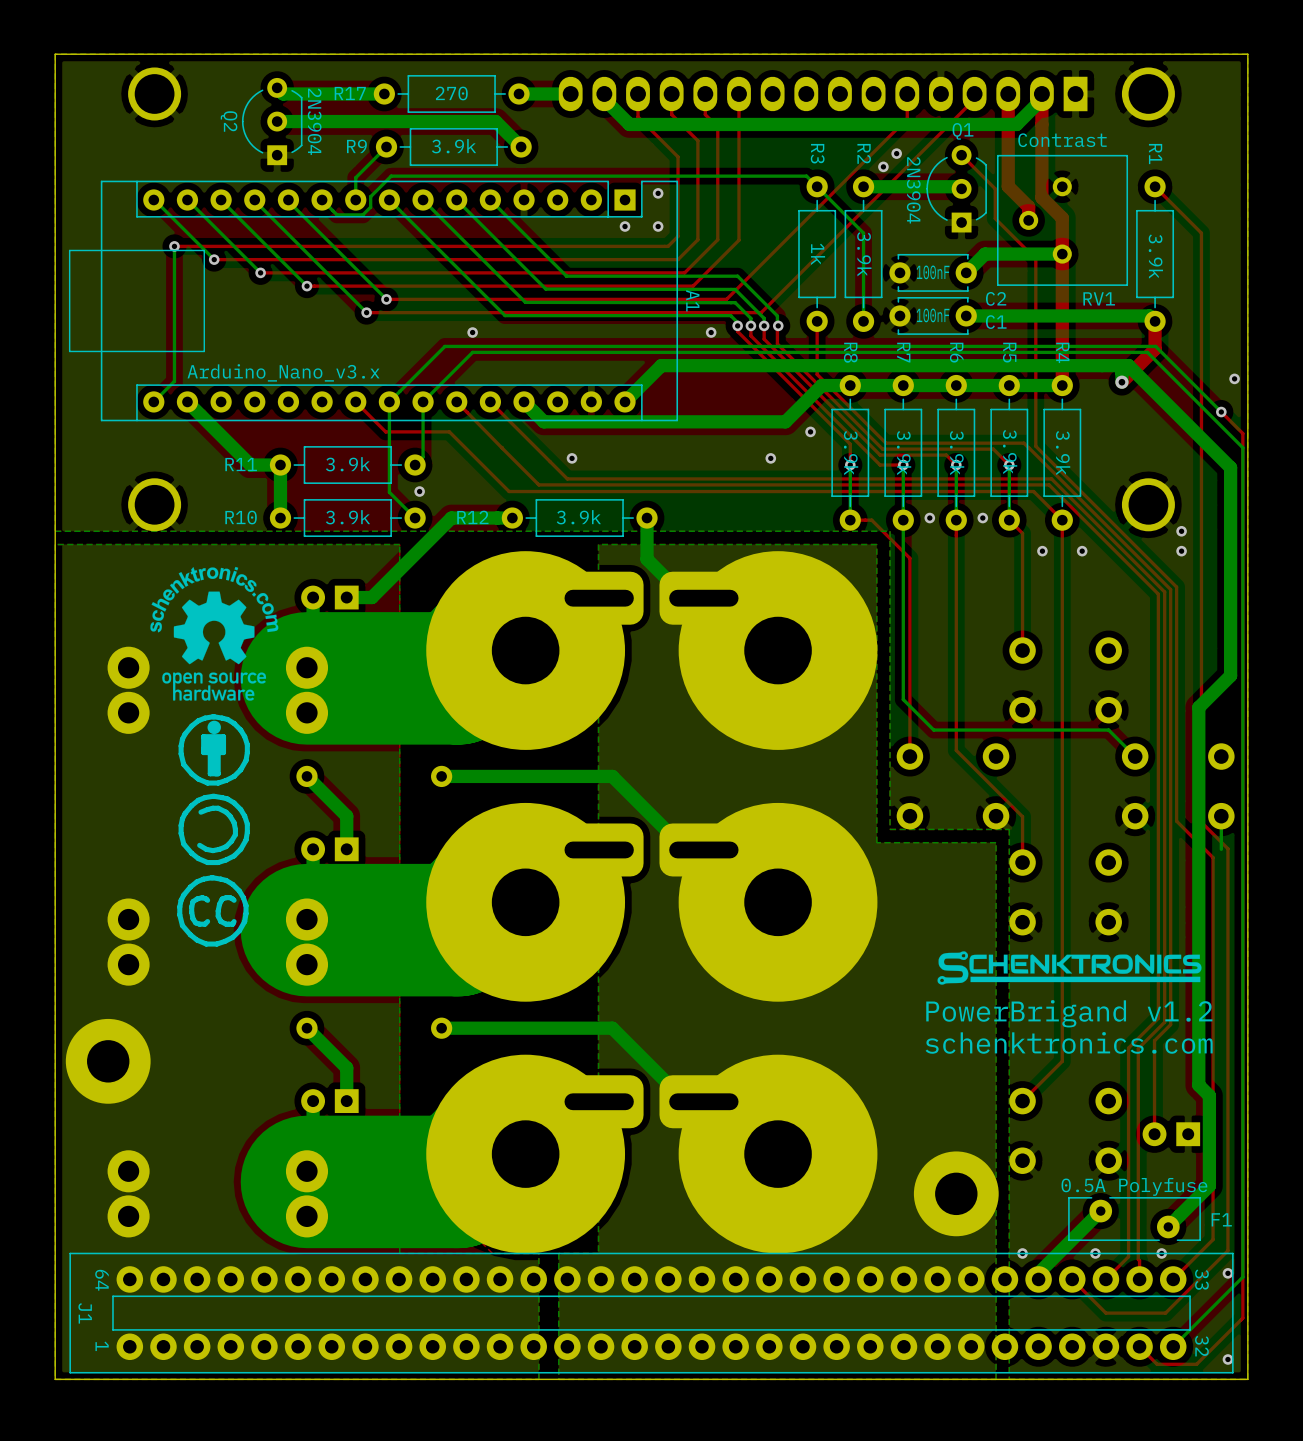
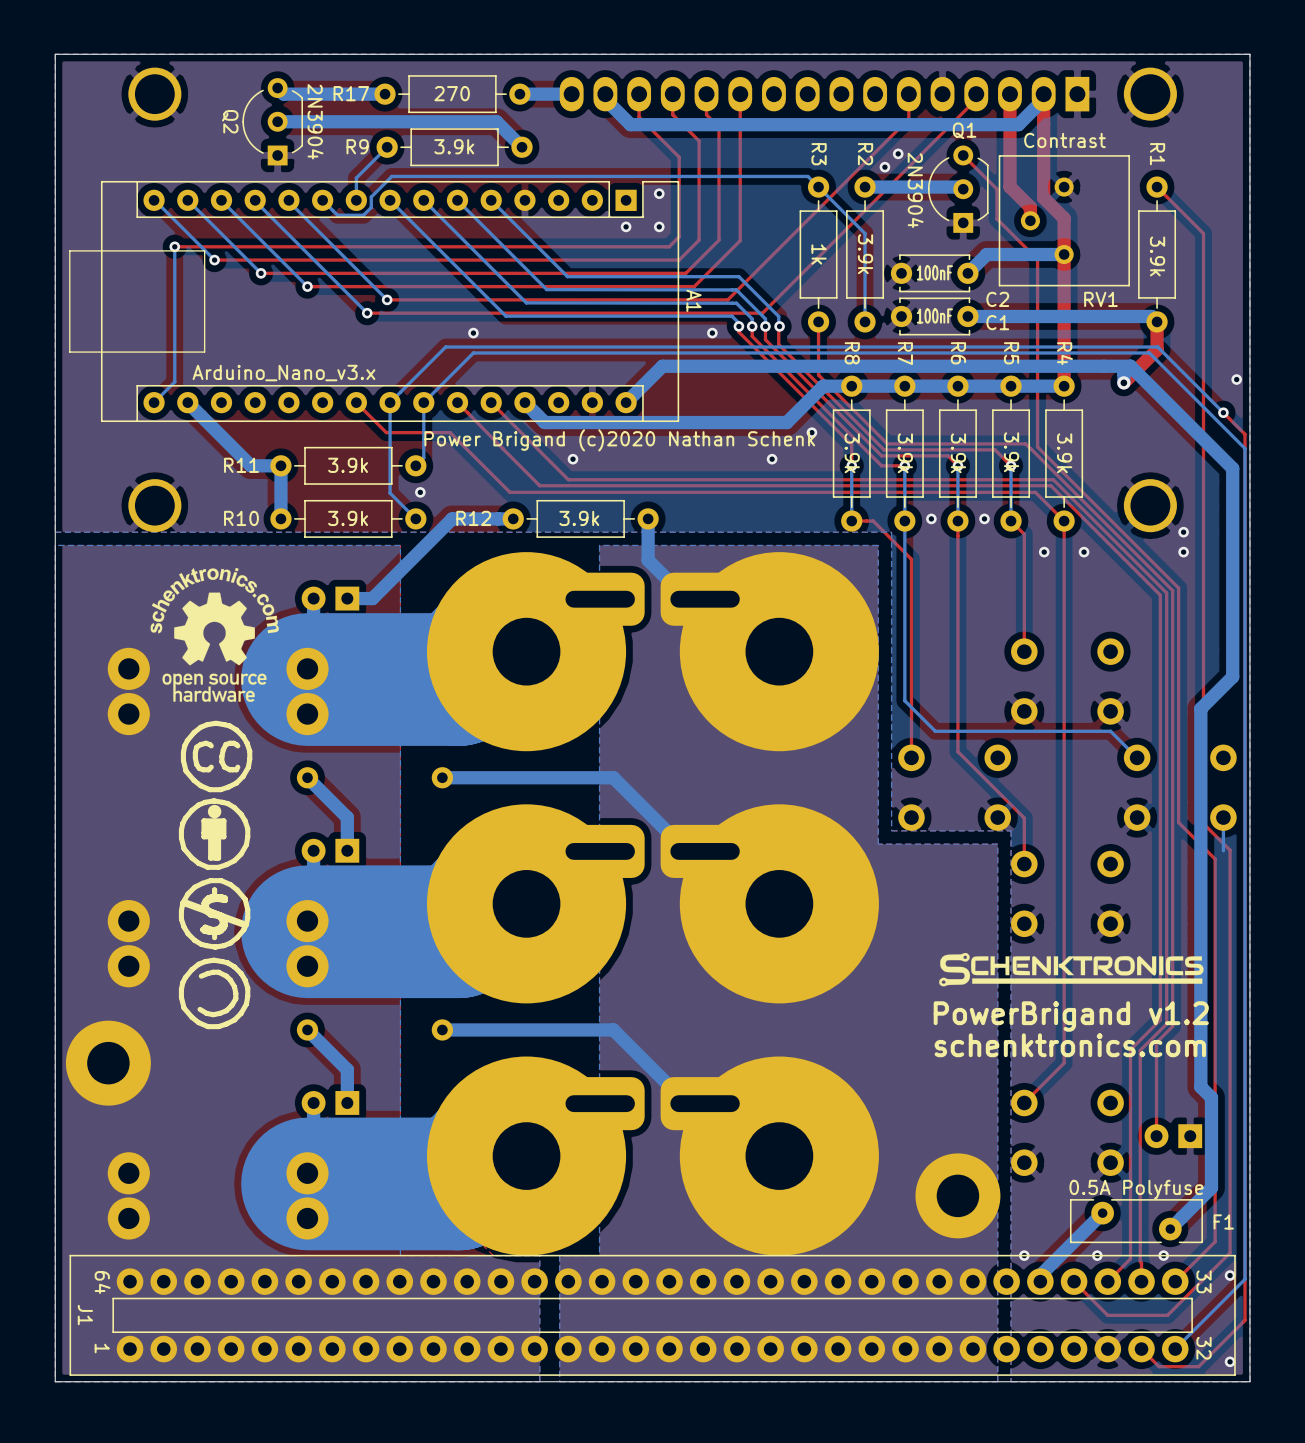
text: none -> Power Brigand (c)2020 Nathan Schenk (619, 440)
drawing position: (214, 749) -> (214, 834)
drawing position: (214, 829) -> (214, 993)
drawing: none -> [178, 878, 251, 950]
drawing position: (212, 910) -> (216, 756)

